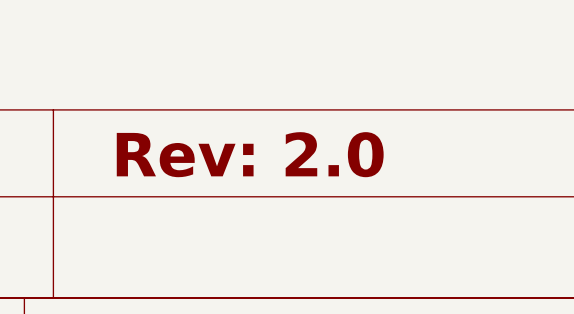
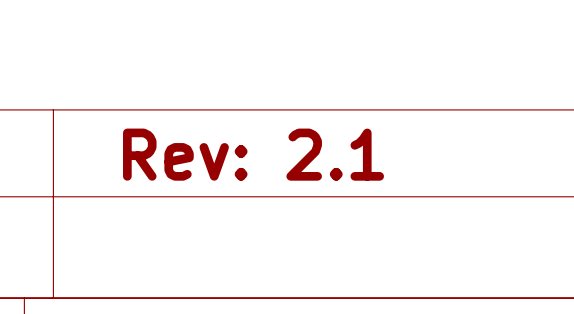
title block: Rev: 2.0 (250, 154) -> Rev: 2.1 (253, 154)

